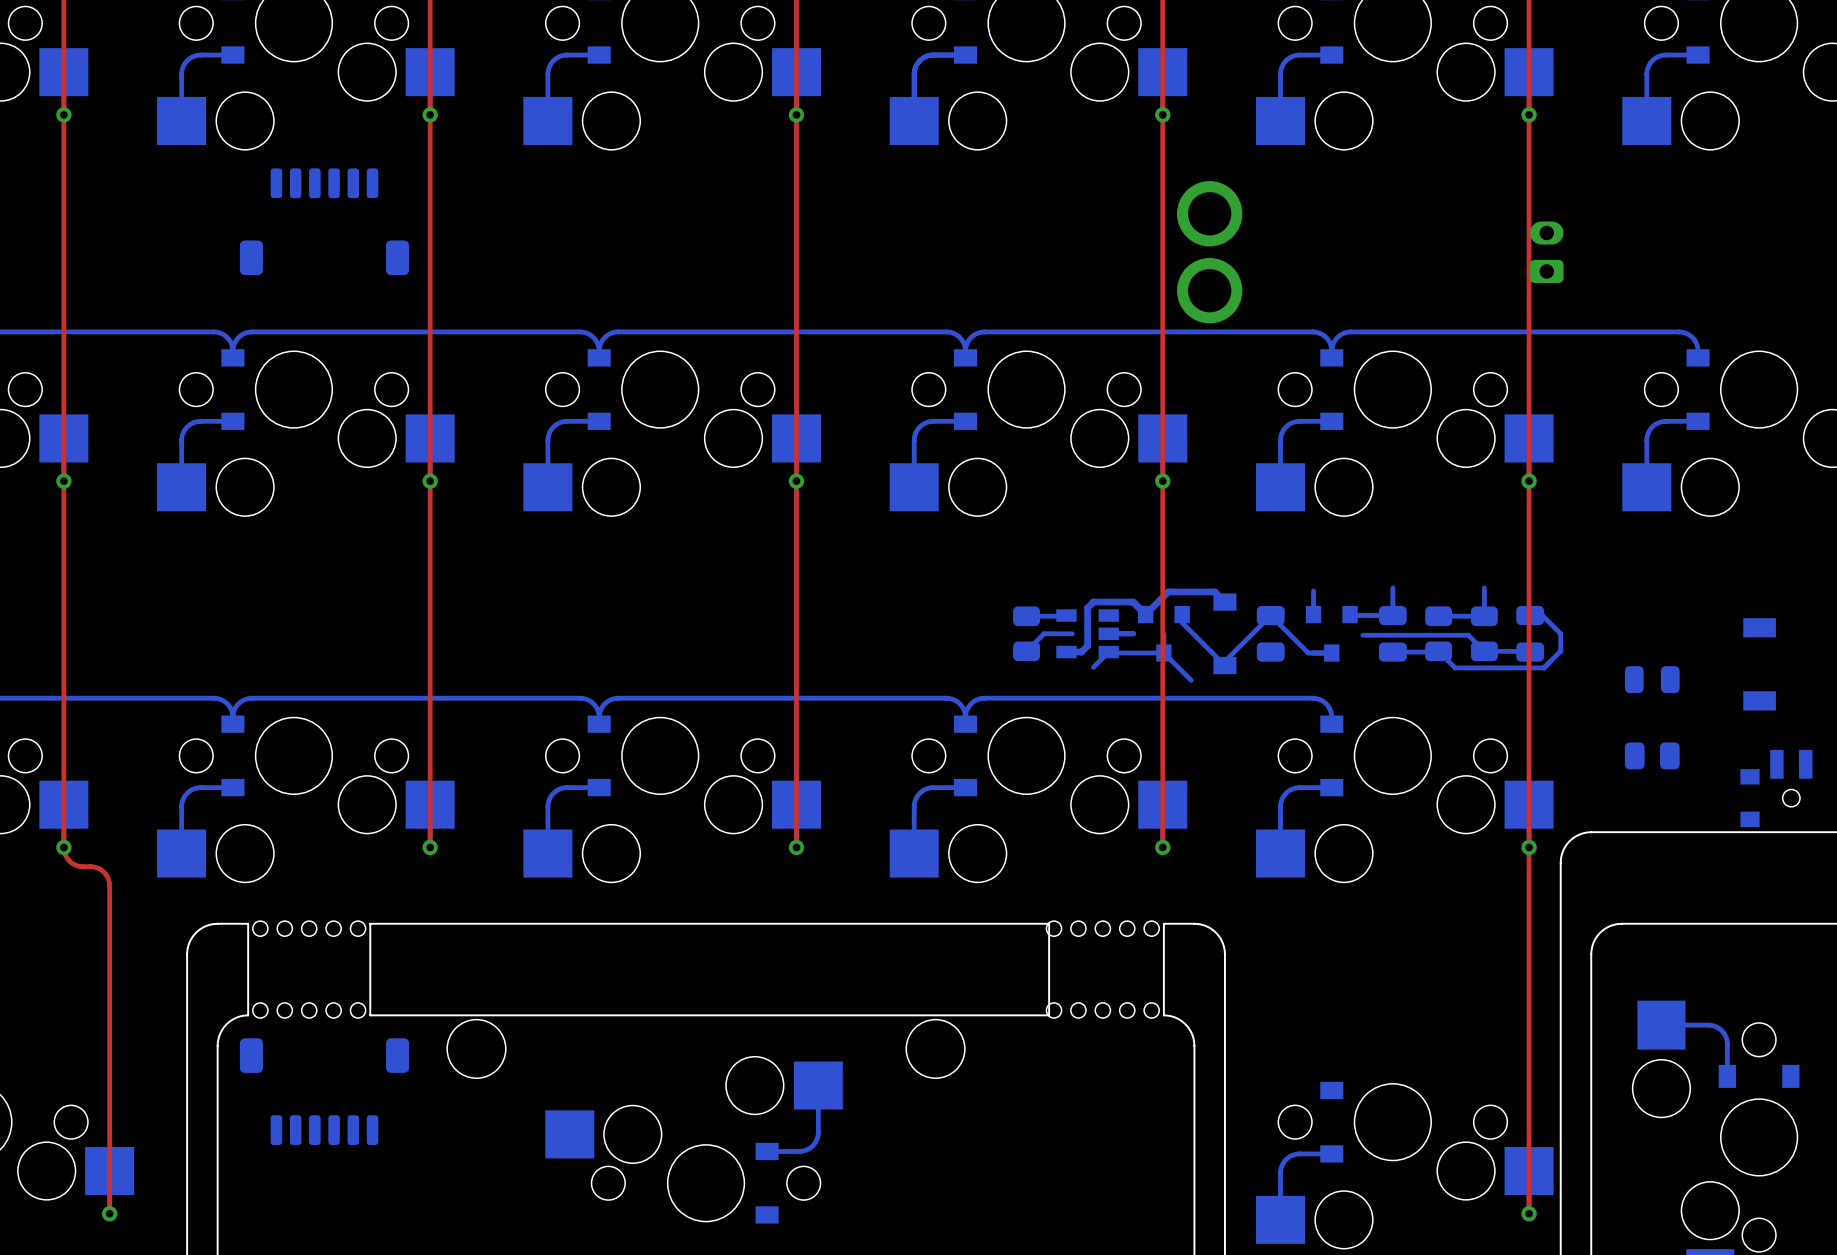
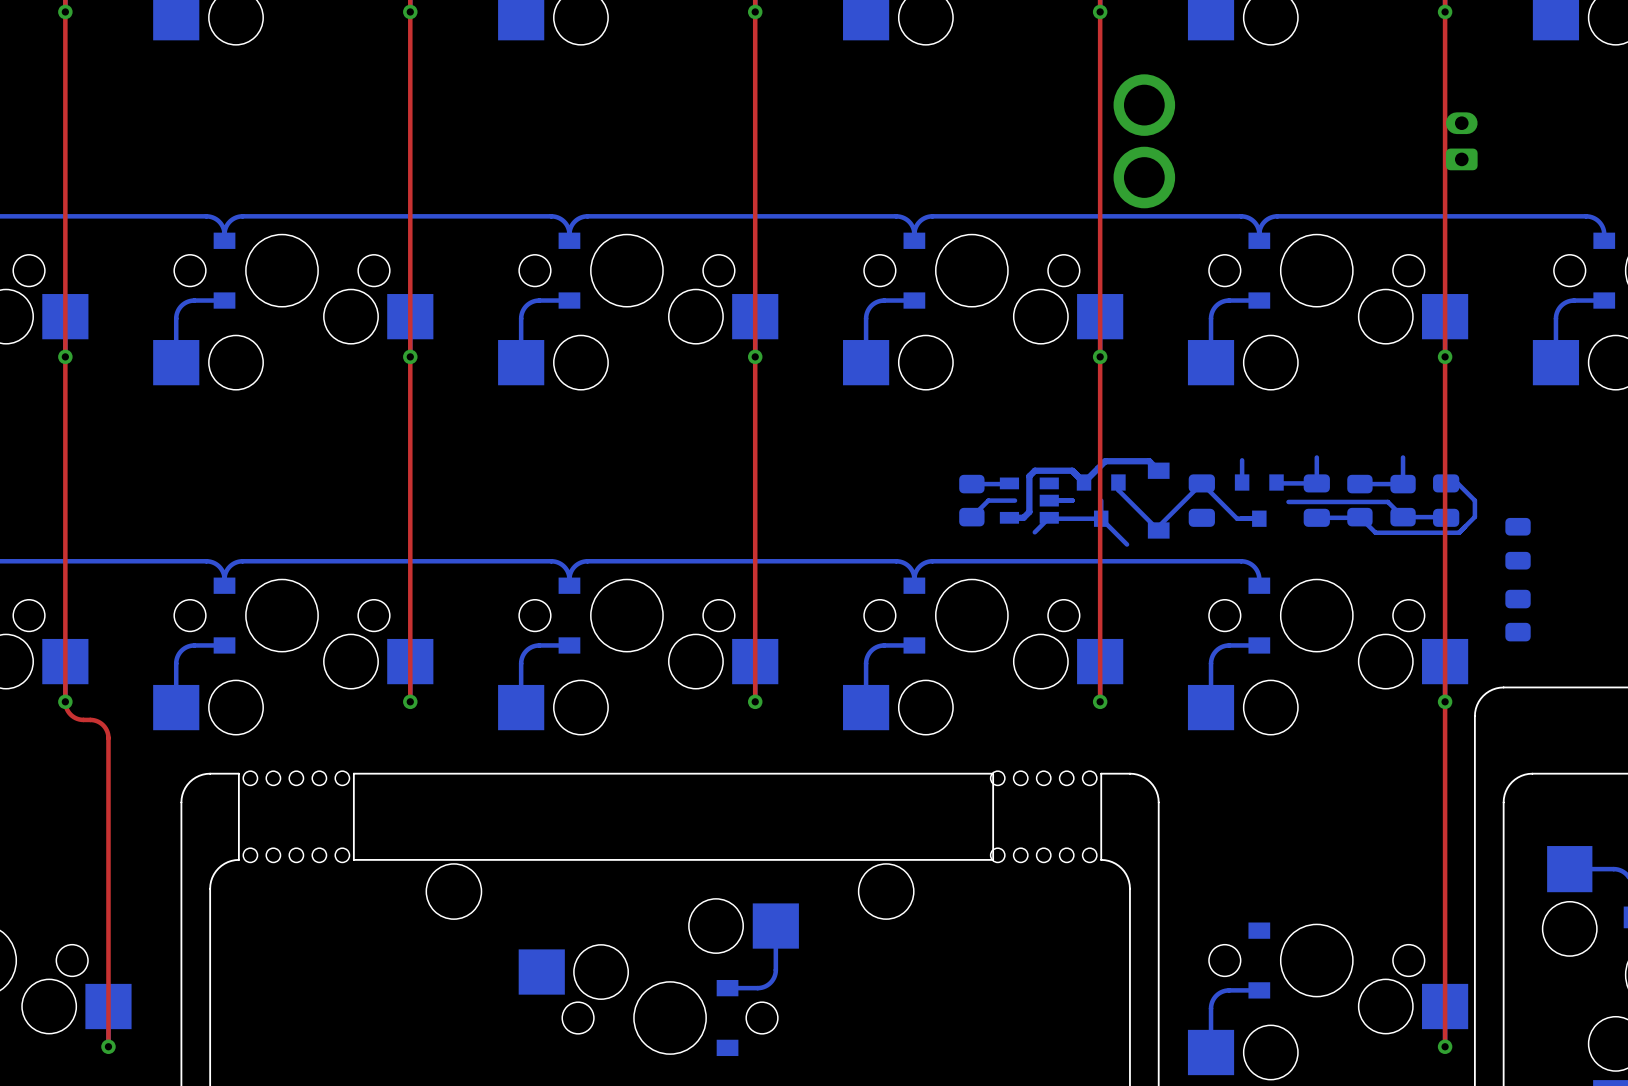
part: (324, 221) -> none
part rotation: 0° (1652, 679) -> 90° clockwise (1518, 543)
part position: (1652, 679) -> (1518, 543)
part rotation: 0° (1652, 755) -> 90° clockwise (1518, 615)
part position: (1652, 755) -> (1518, 615)
part: (324, 1091) -> none

